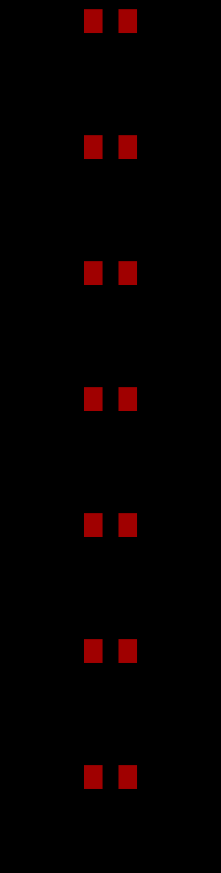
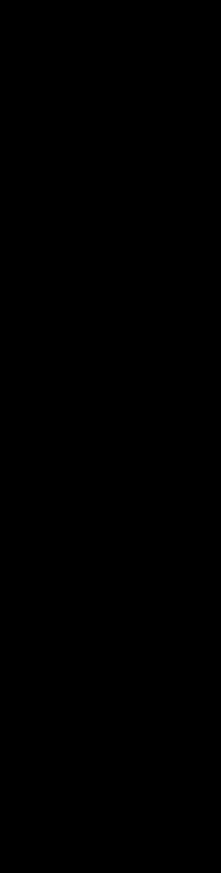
part: (110, 21) -> none
part: (110, 147) -> none
part: (110, 273) -> none
part: (110, 399) -> none
part: (110, 525) -> none
part: (110, 651) -> none
part: (110, 777) -> none

